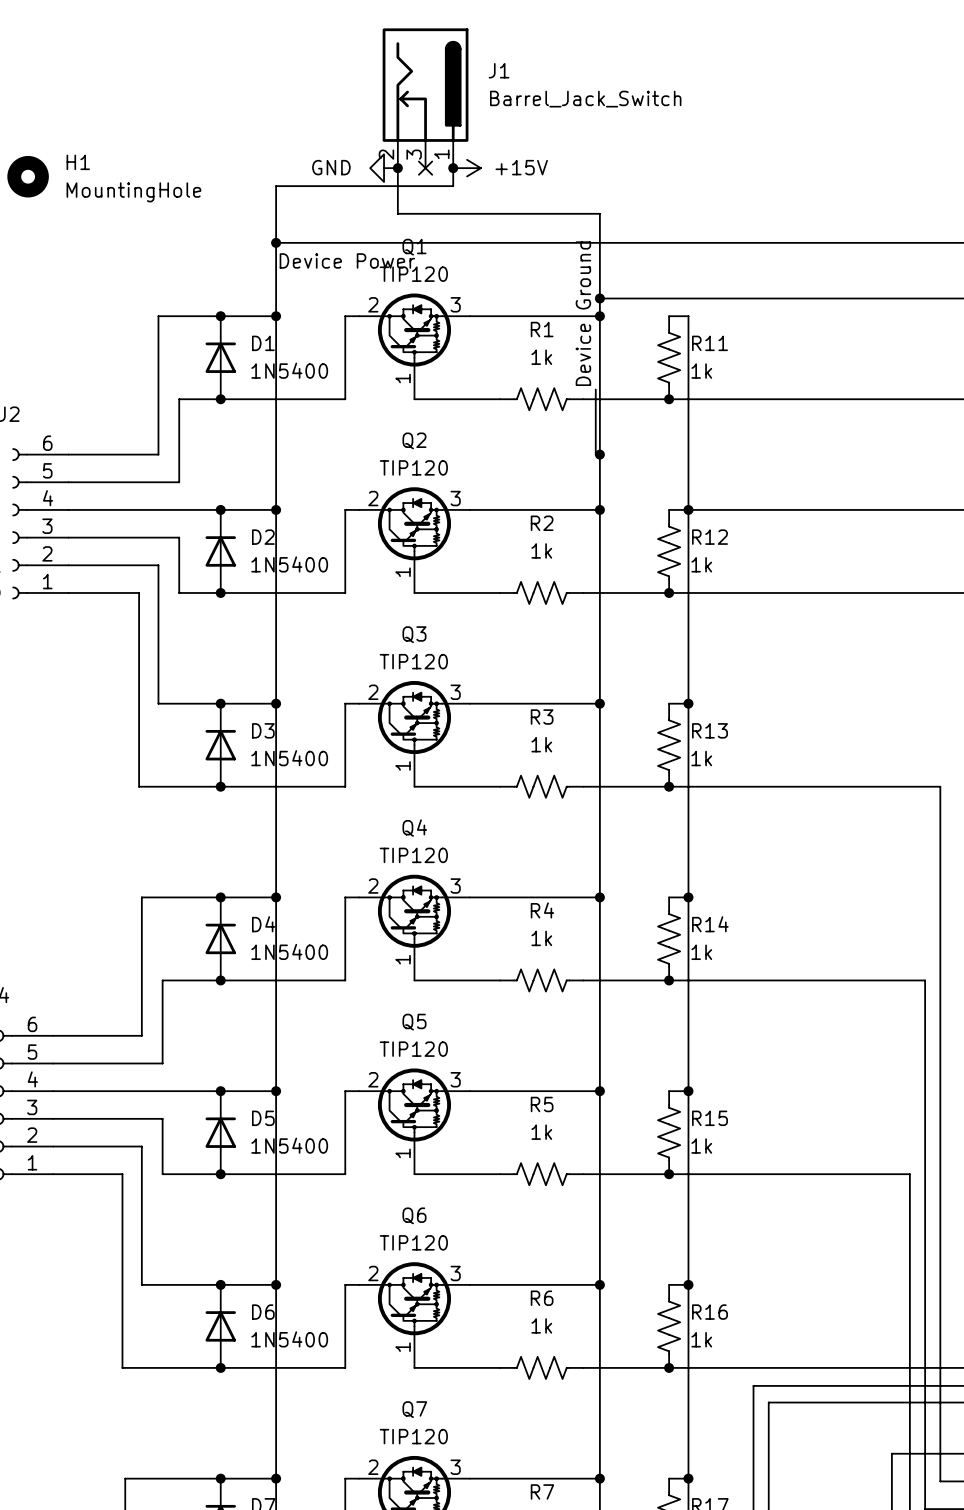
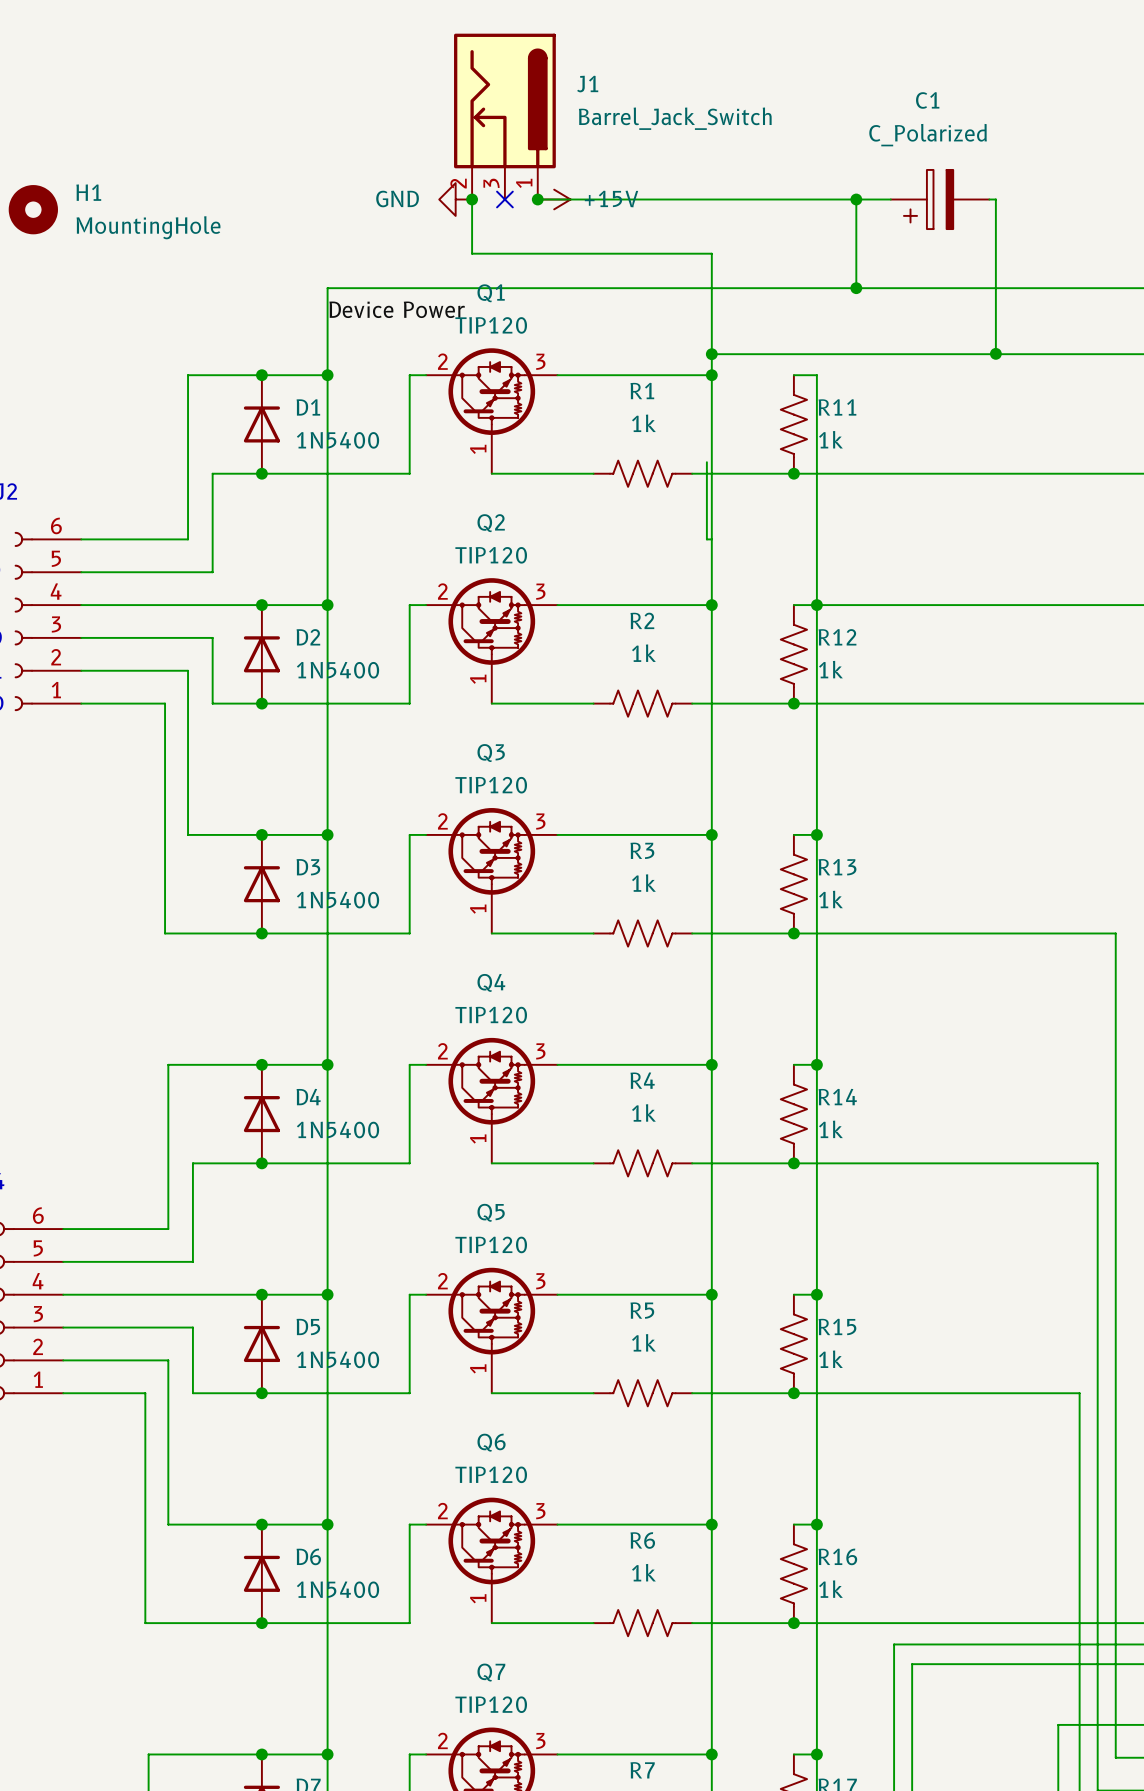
wire: (453, 168) (453, 186) (276, 186) (276, 242) -> (537, 199) (890, 199)
wire: none -> (856, 199) (856, 288)
junction: none -> (856, 199)
C1: none -> C_Polarized (940, 199)
wire: none -> (989, 199) (995, 199) (995, 353)
junction: (276, 242) -> none
junction: none -> (856, 288)
junction: none -> (995, 353)
label: Device Ground (583, 313) -> none
junction: (599, 454) -> none

